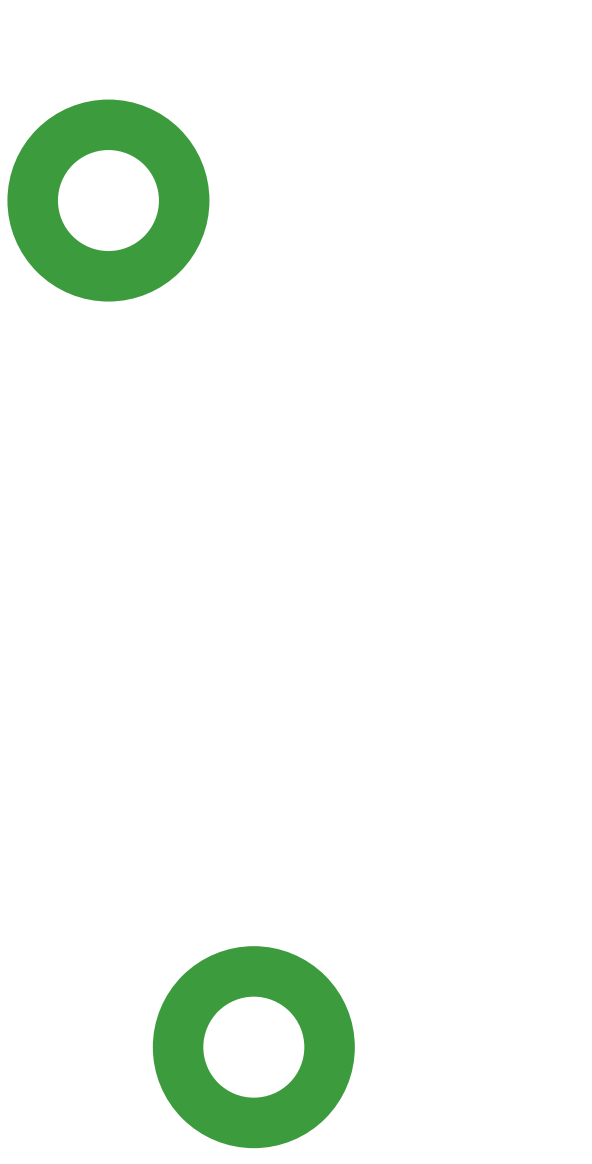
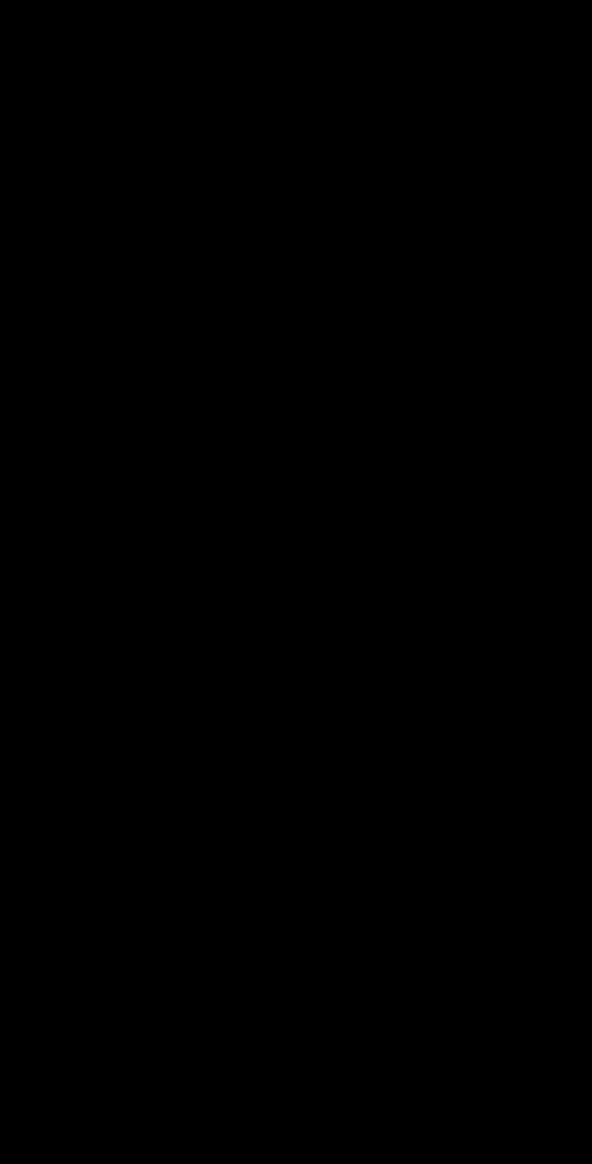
part: (108, 200) -> none
part: (253, 1047) -> none

